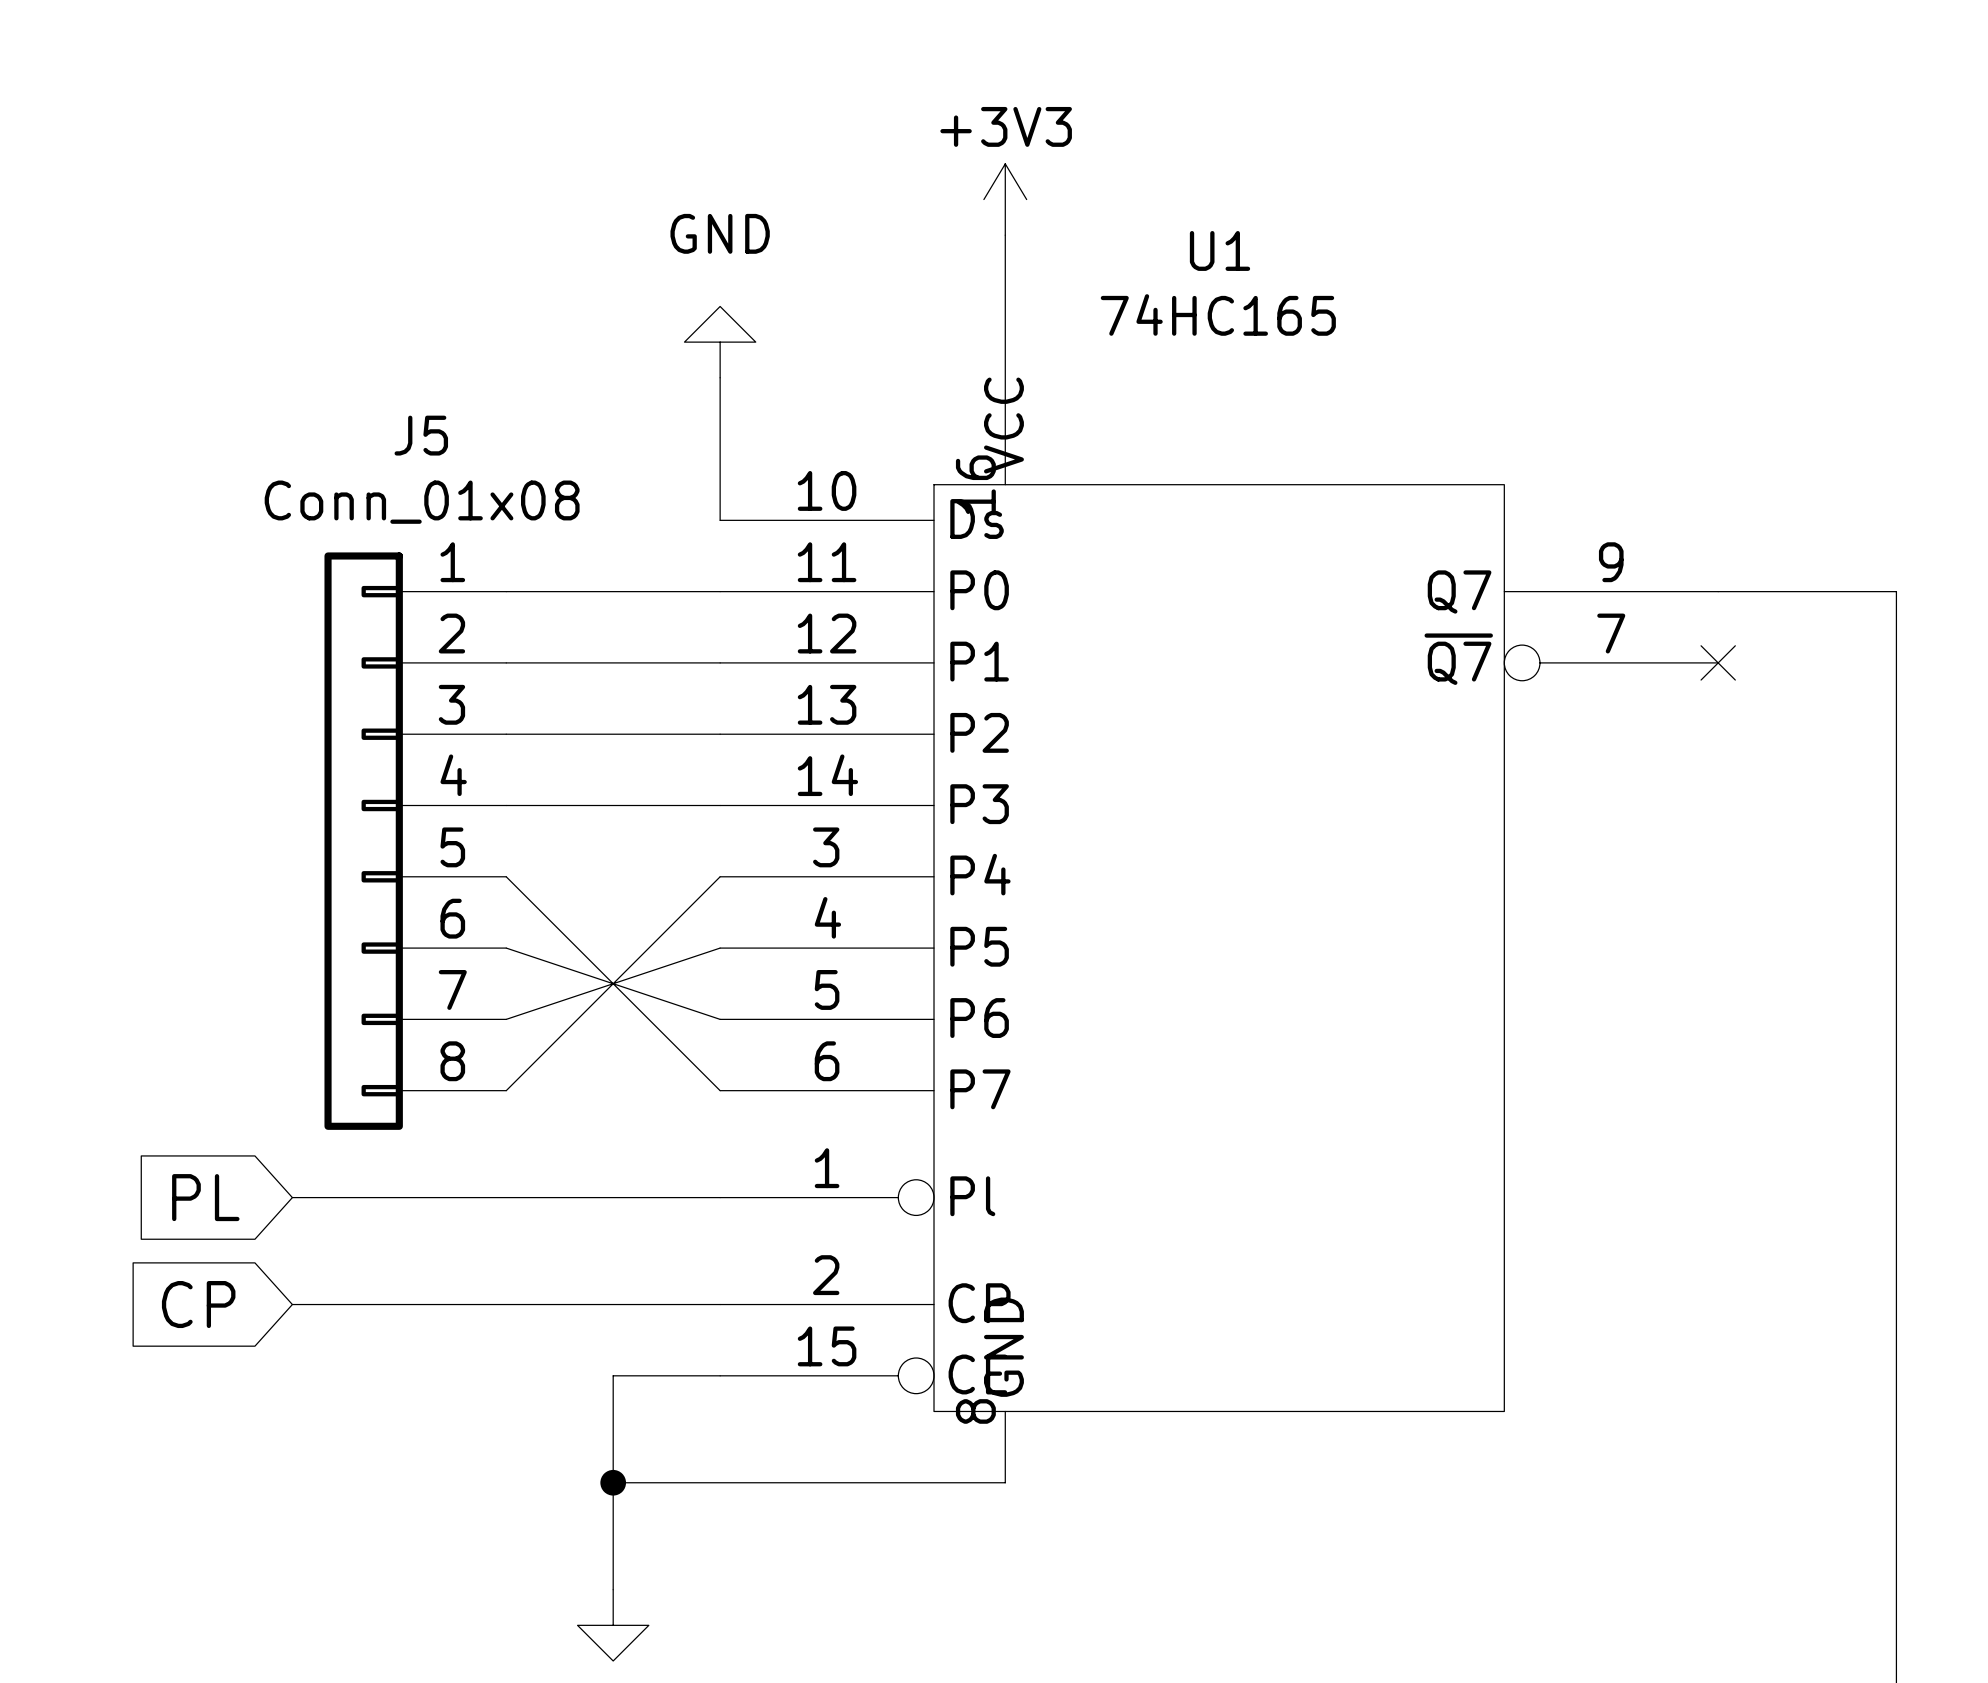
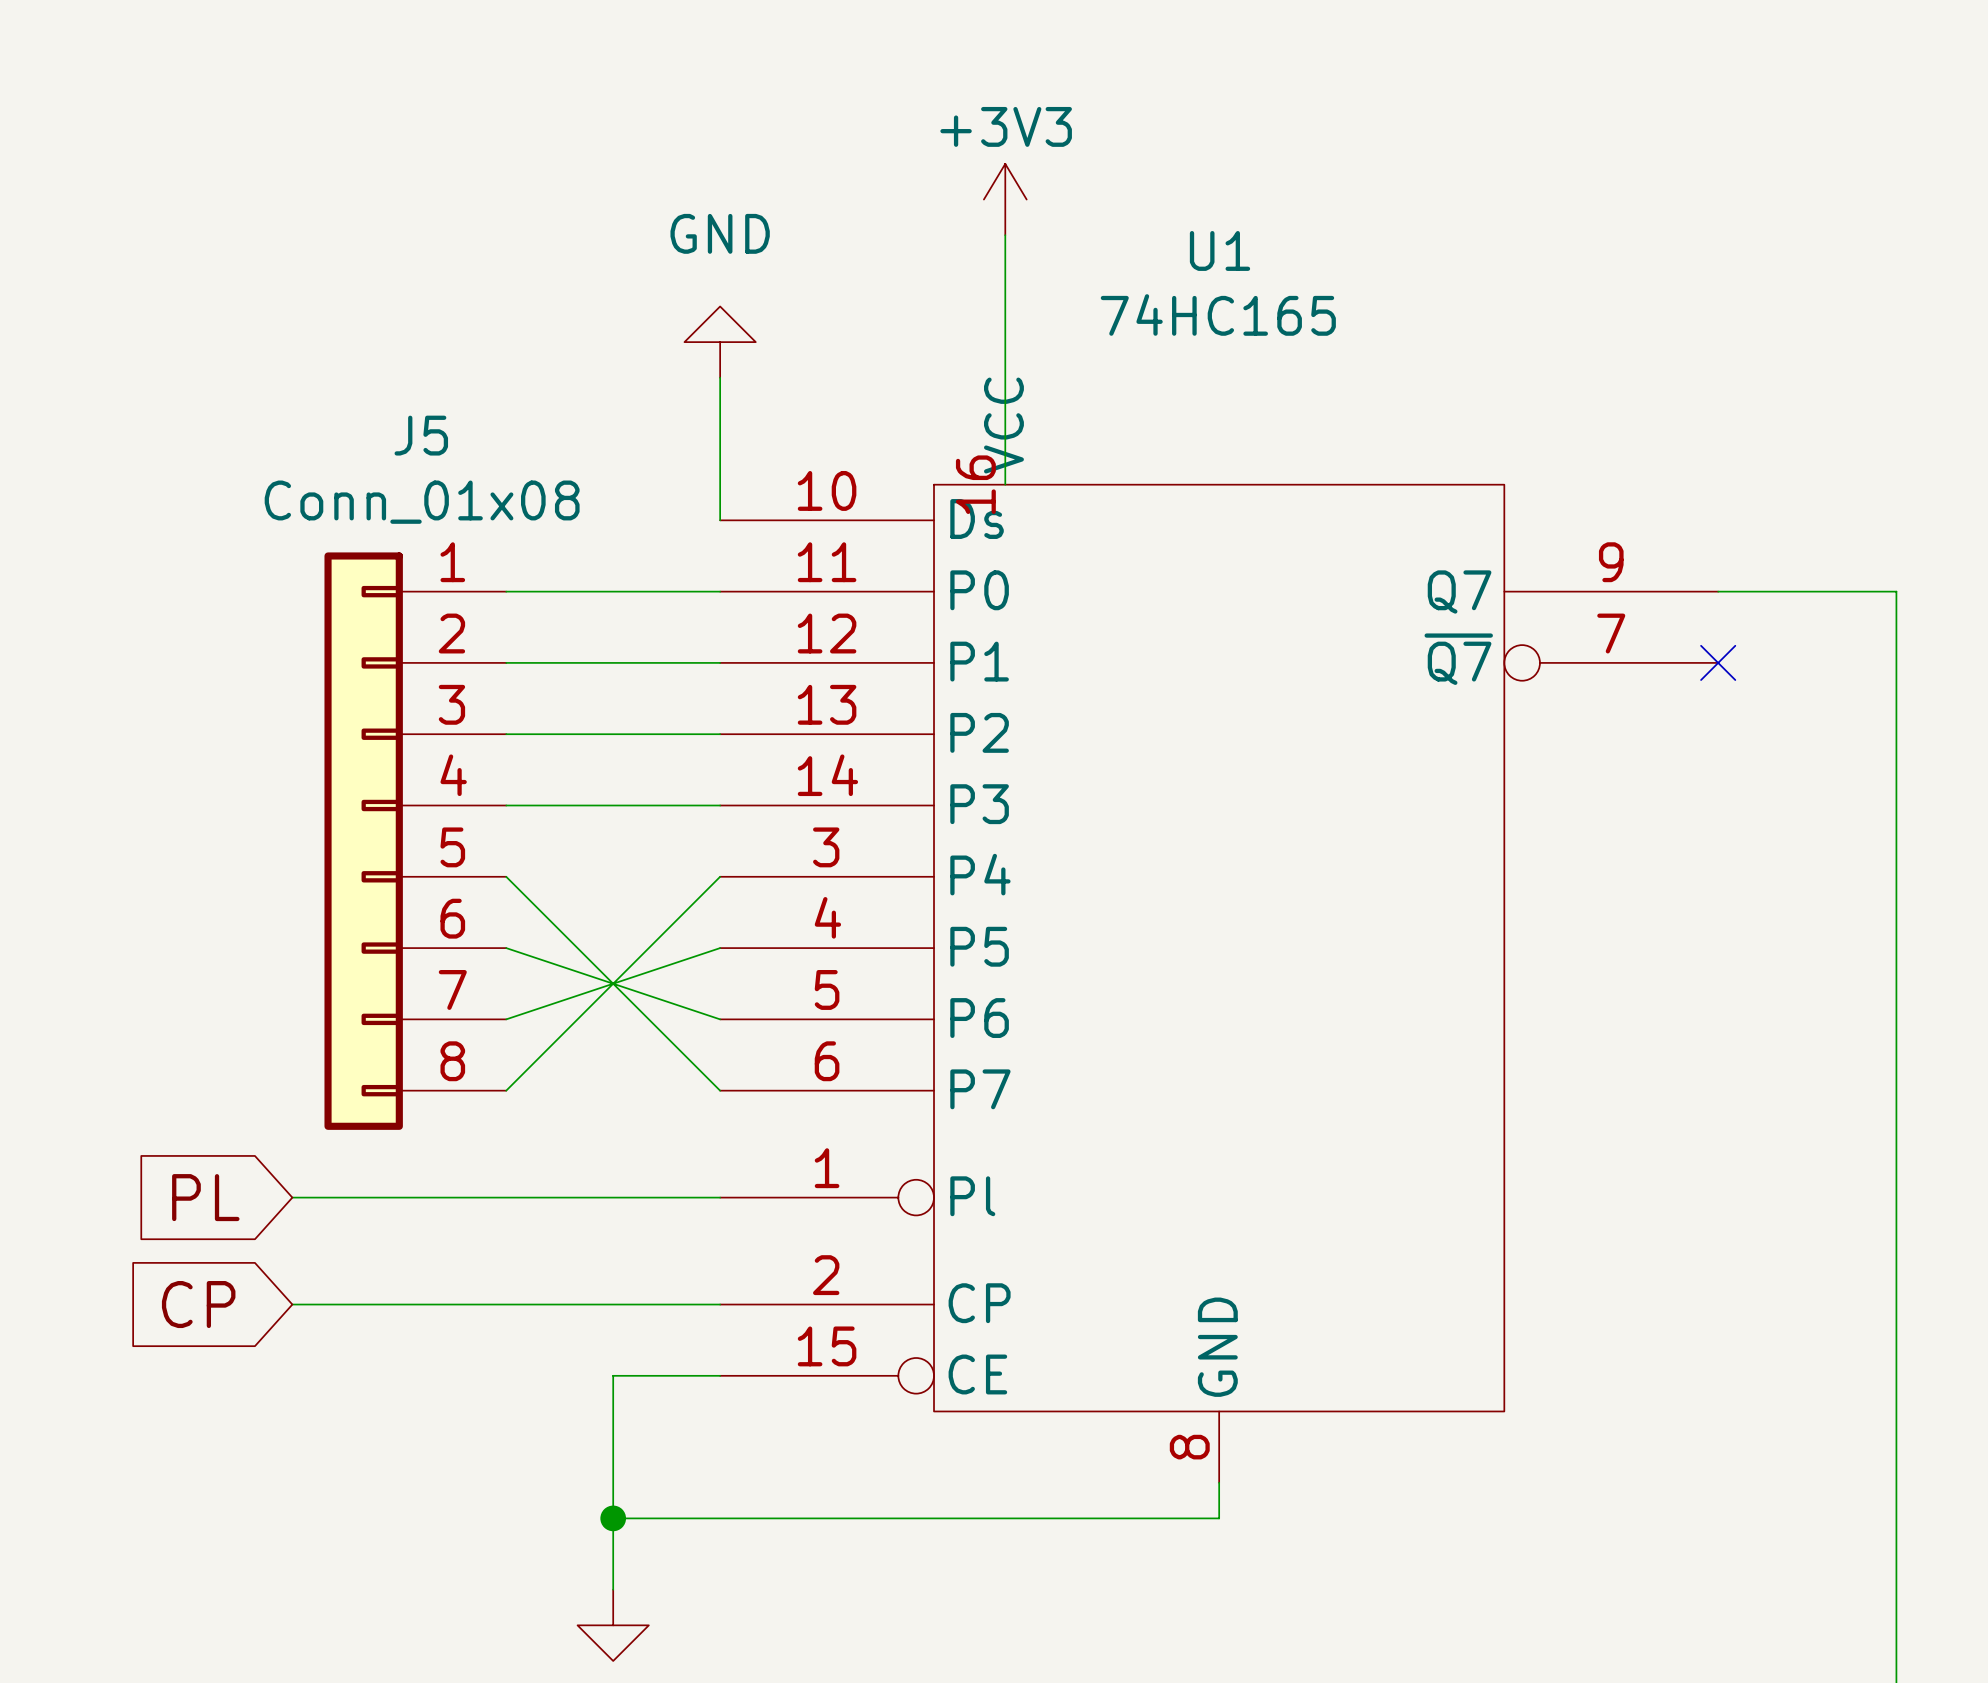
U1 symbol: [720, 484, 1719, 1412] -> [720, 484, 1719, 1483]
wire: (1005, 1411) (1005, 1482) (613, 1482) -> none
junction position: (613, 1482) -> (613, 1518)
wire: none -> (1219, 1482) (1219, 1518) (613, 1518)

